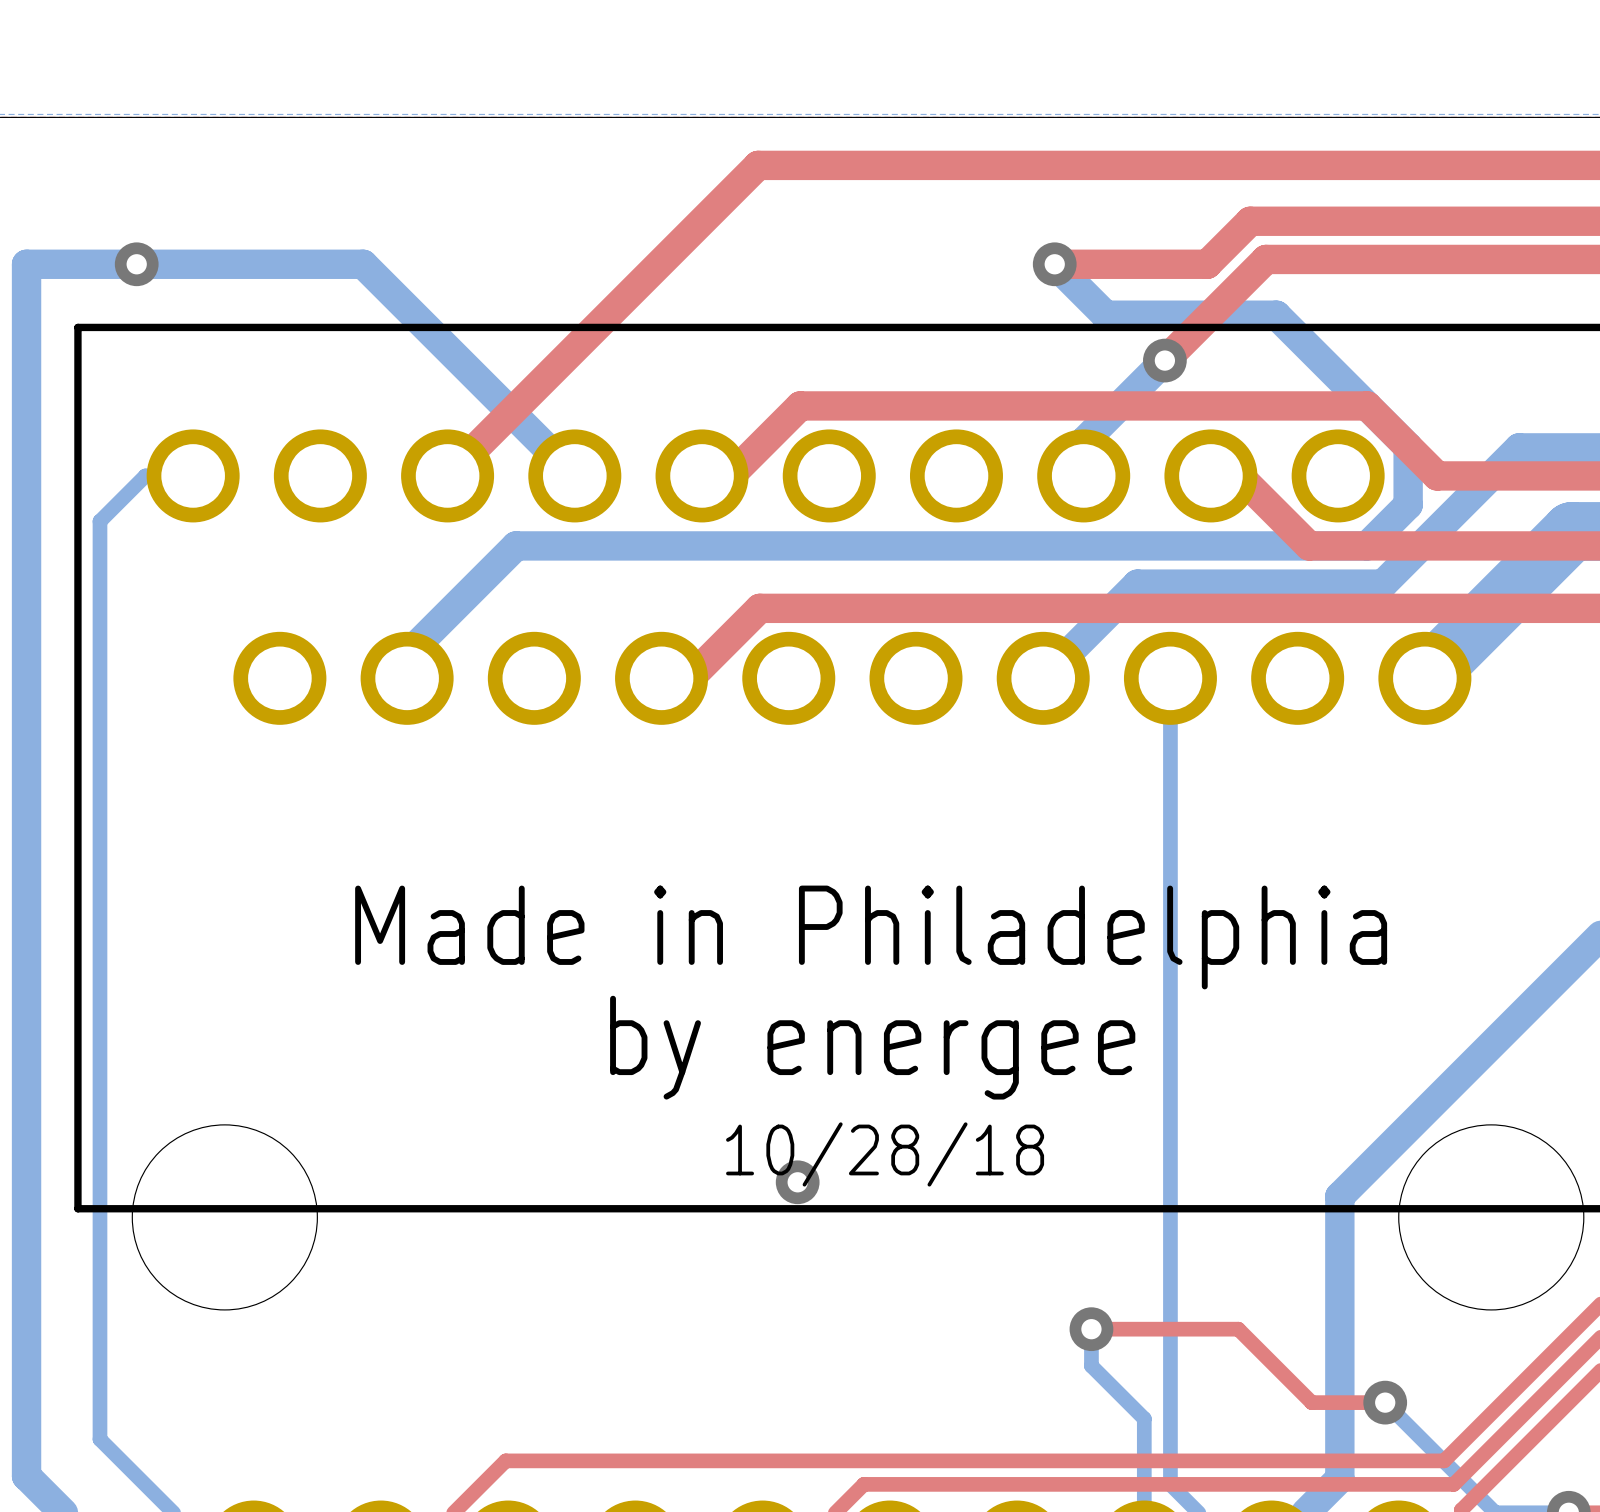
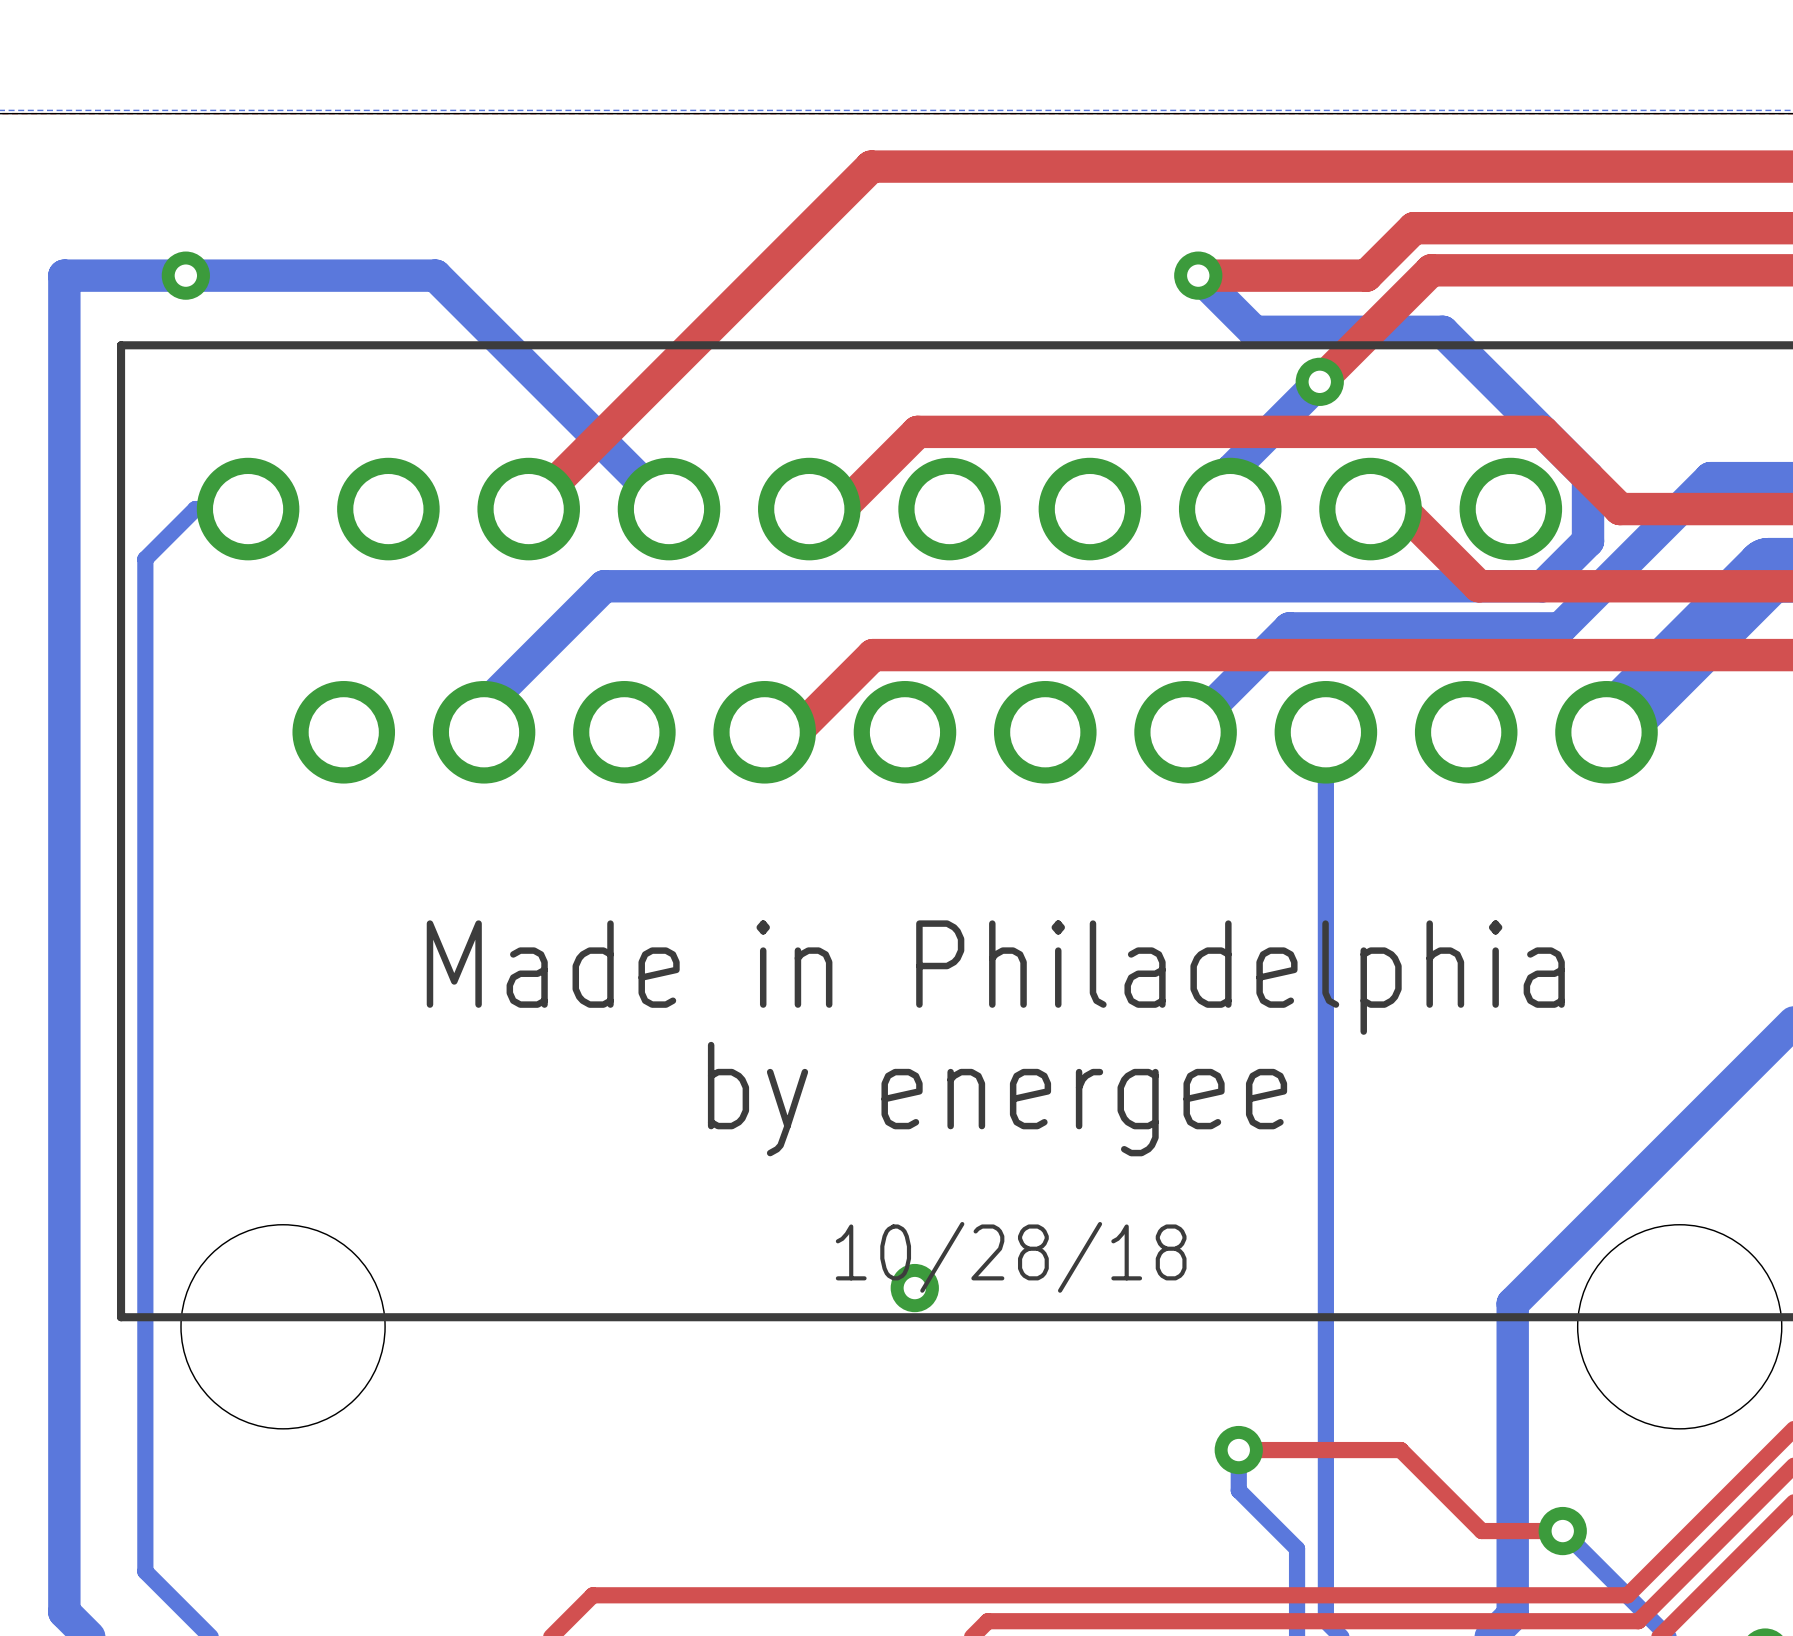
text position: Made in Philadelphia (871, 937) -> Made in Philadelphia (995, 977)
text position: by energee (872, 1047) -> by energee (997, 1099)

